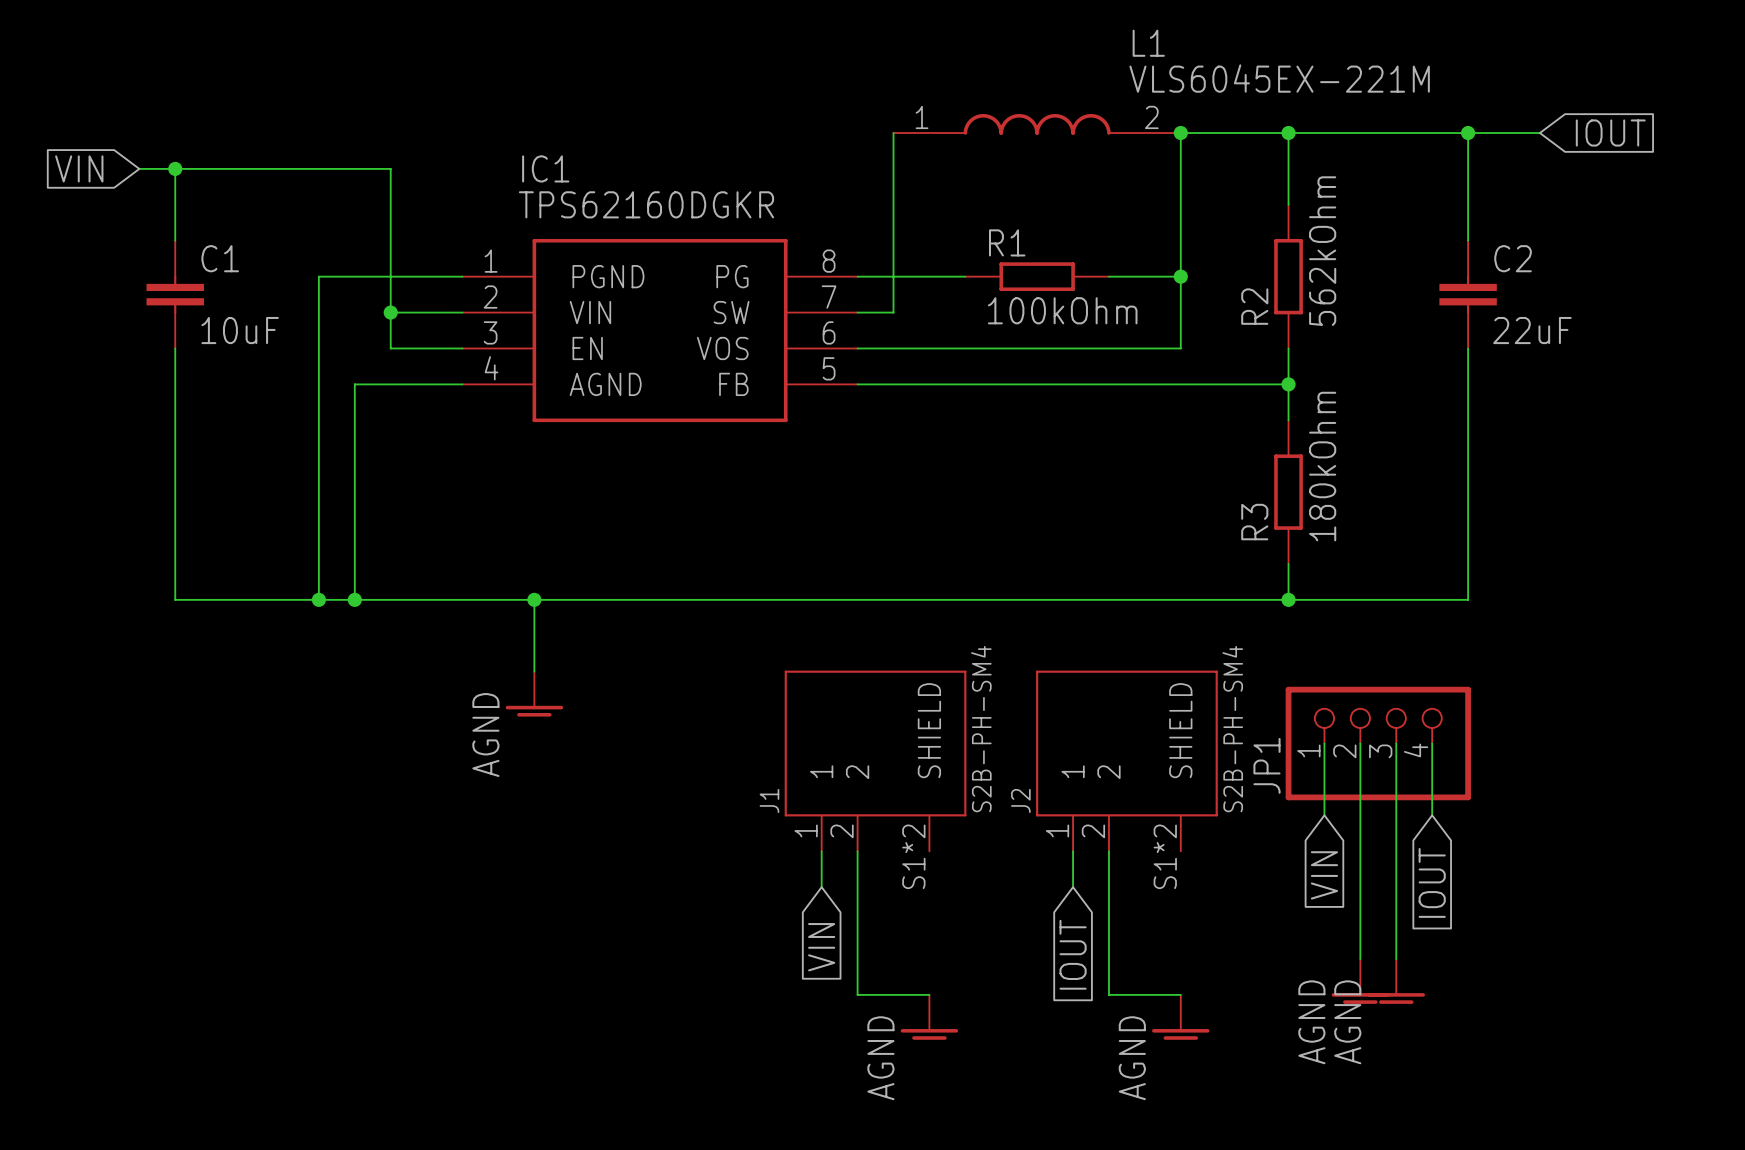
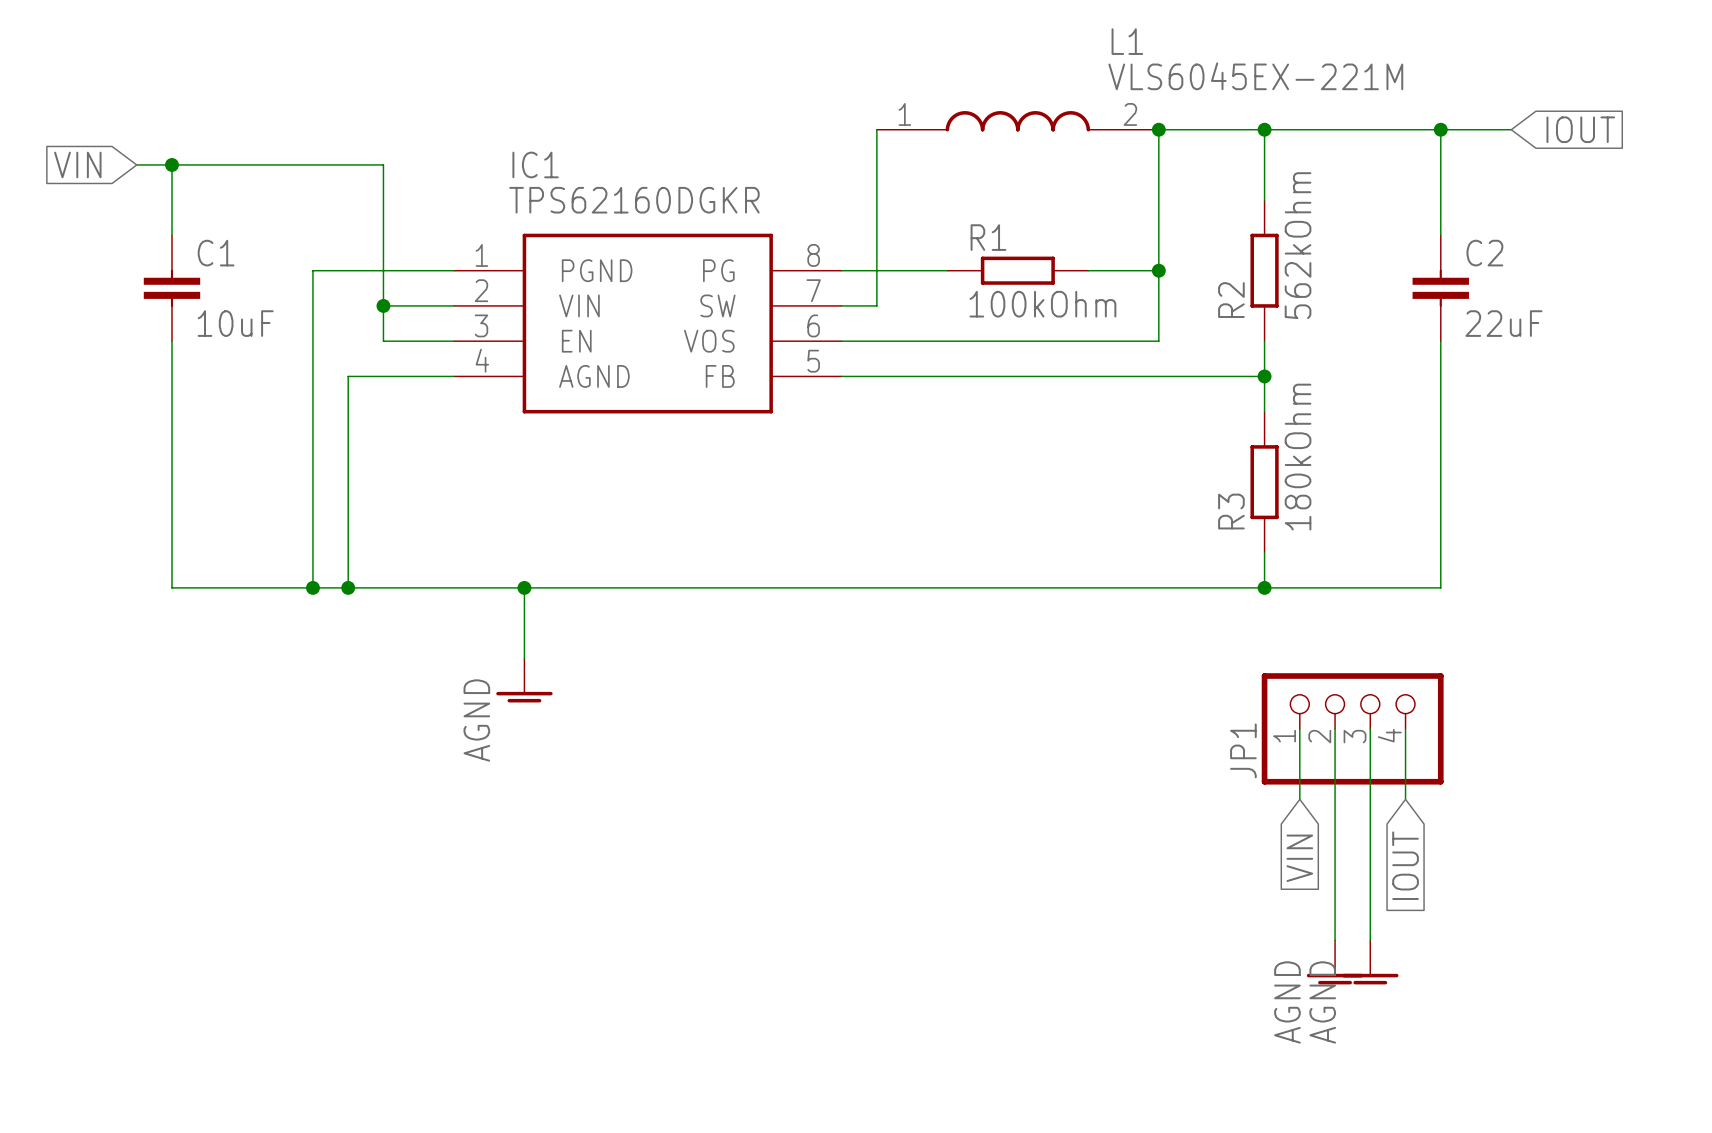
J1: S2B-PH-SM4 (875, 760) -> none
J2: S2B-PH-SM4 (1126, 760) -> none
wire: (821, 851) (821, 887) -> none
wire: (857, 851) (857, 994) (929, 994) -> none
wire: (1073, 851) (1073, 887) -> none
wire: (1108, 851) (1108, 994) (1180, 994) -> none
global label: VIN (821, 947) -> none
global label: IOUT (1073, 954) -> none
power symbol: AGND (929, 1017) -> none
power symbol: AGND (1180, 1017) -> none

